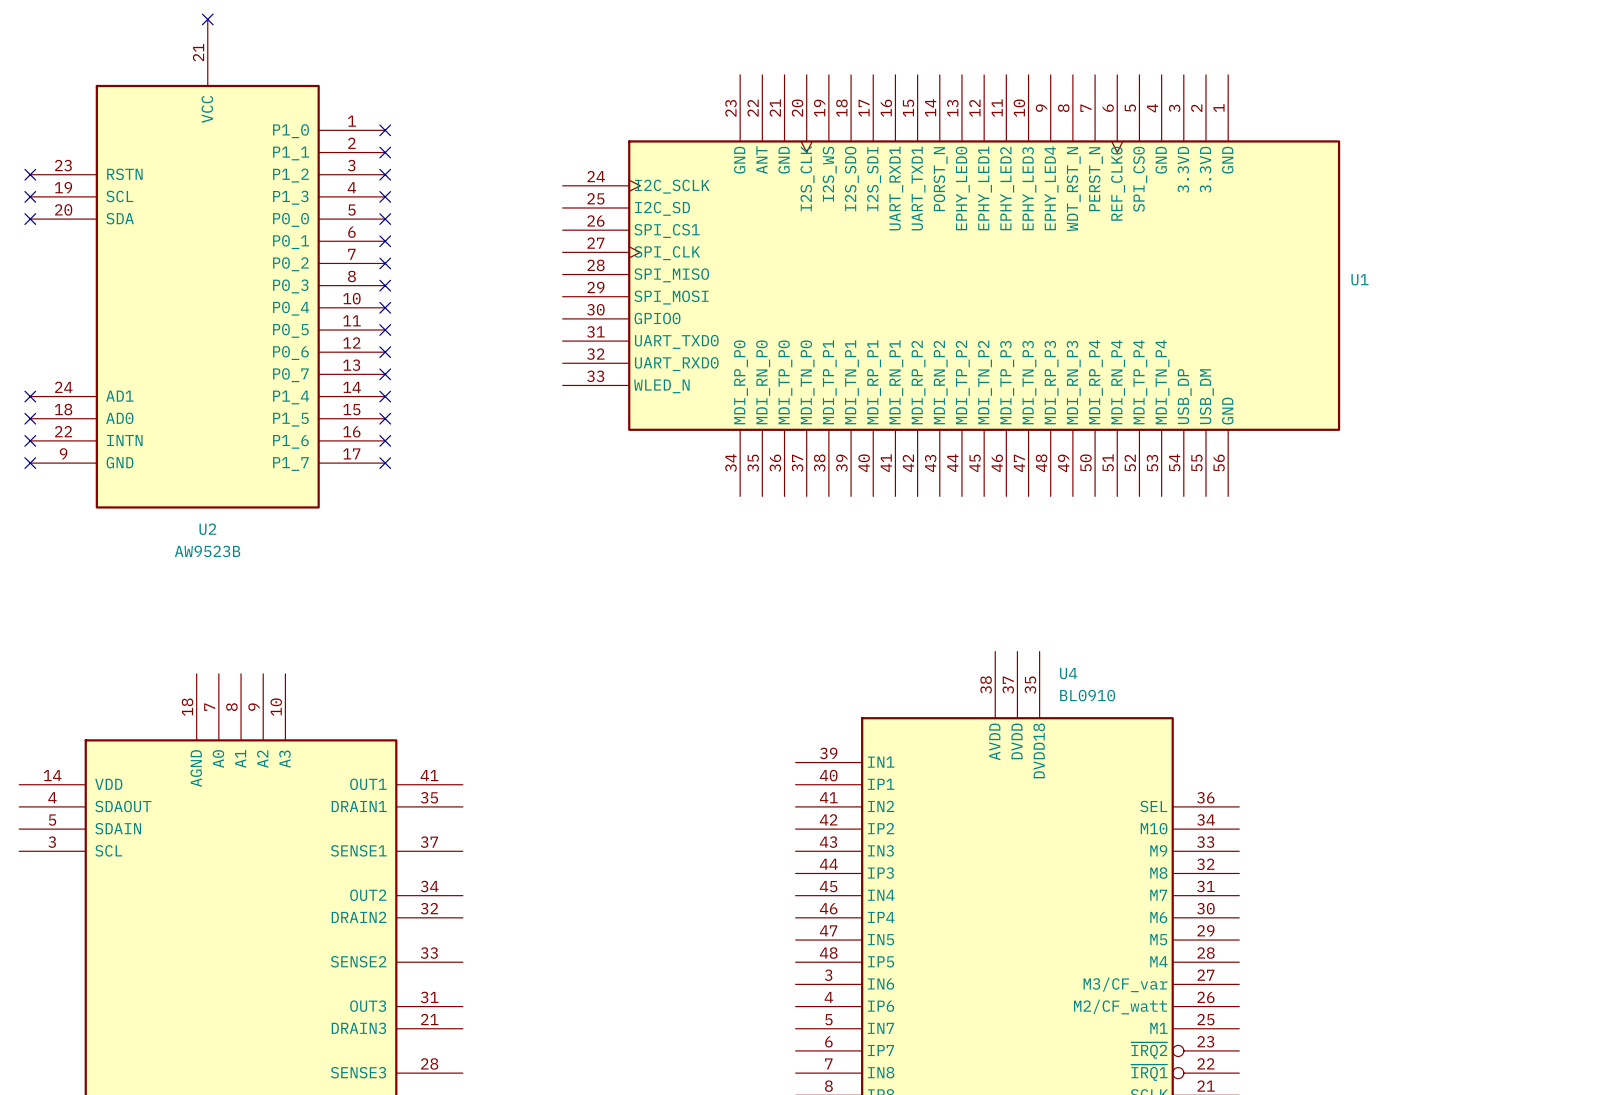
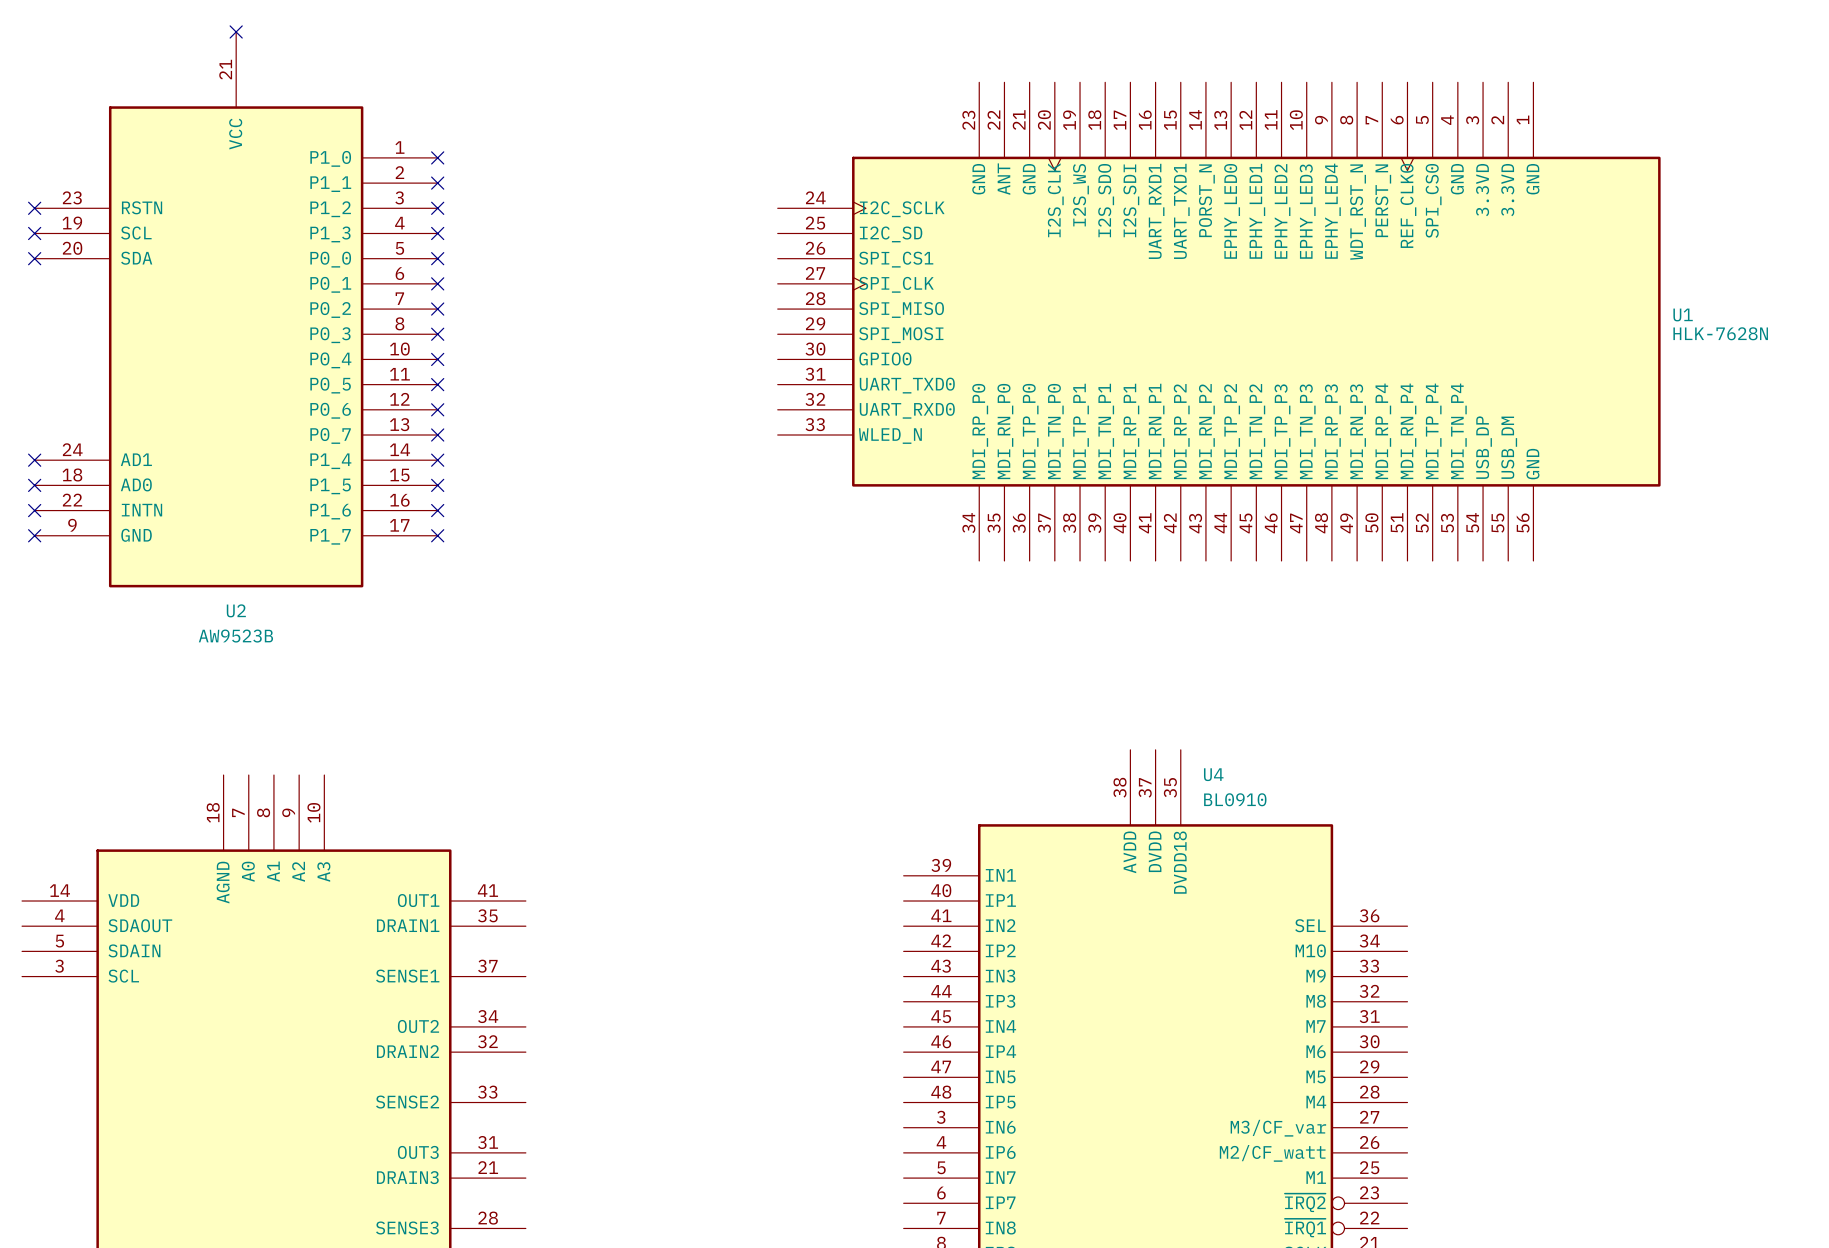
U1 position: (951, 285) -> (1219, 321)
U1 value: none -> HLK-7628N (1720, 333)

